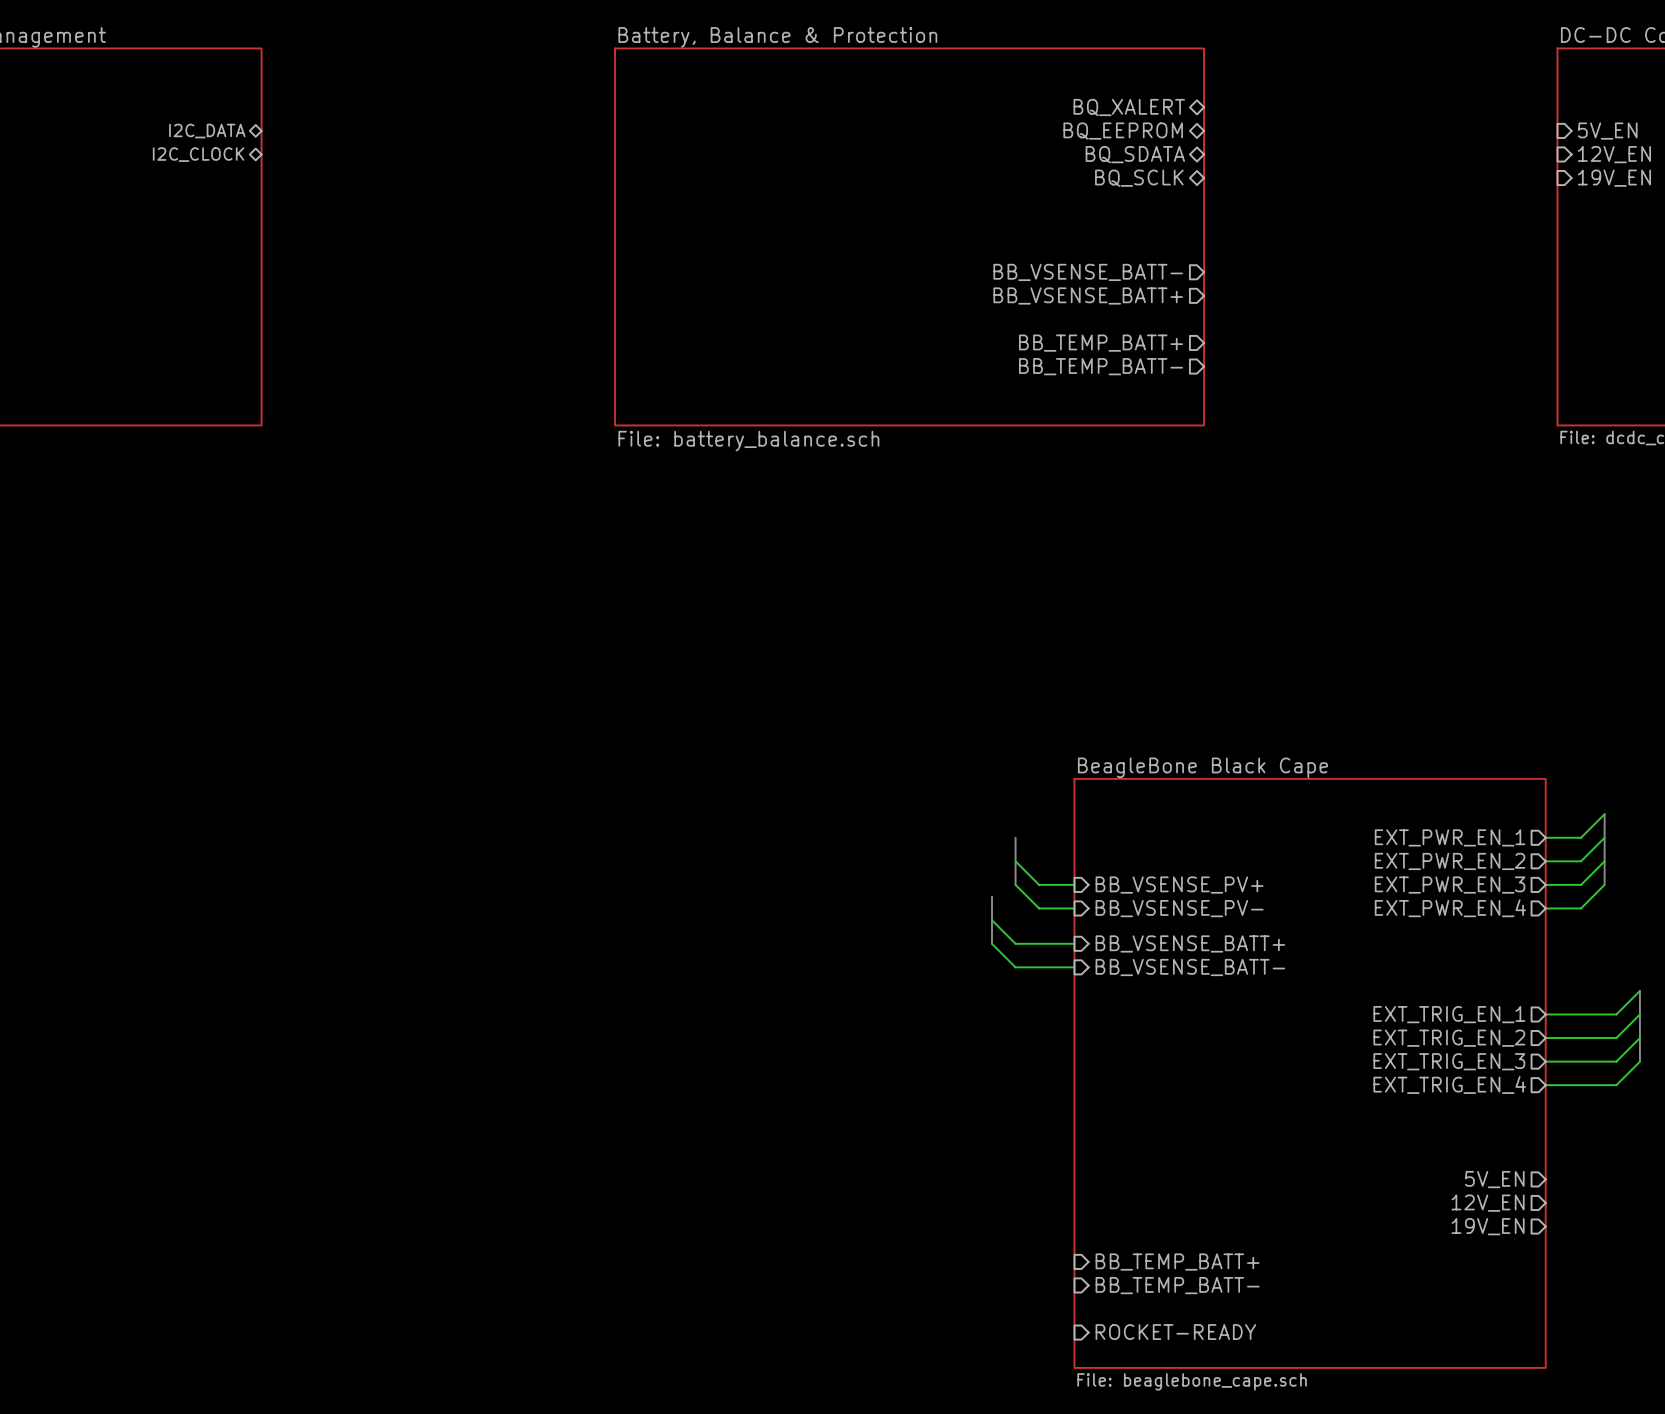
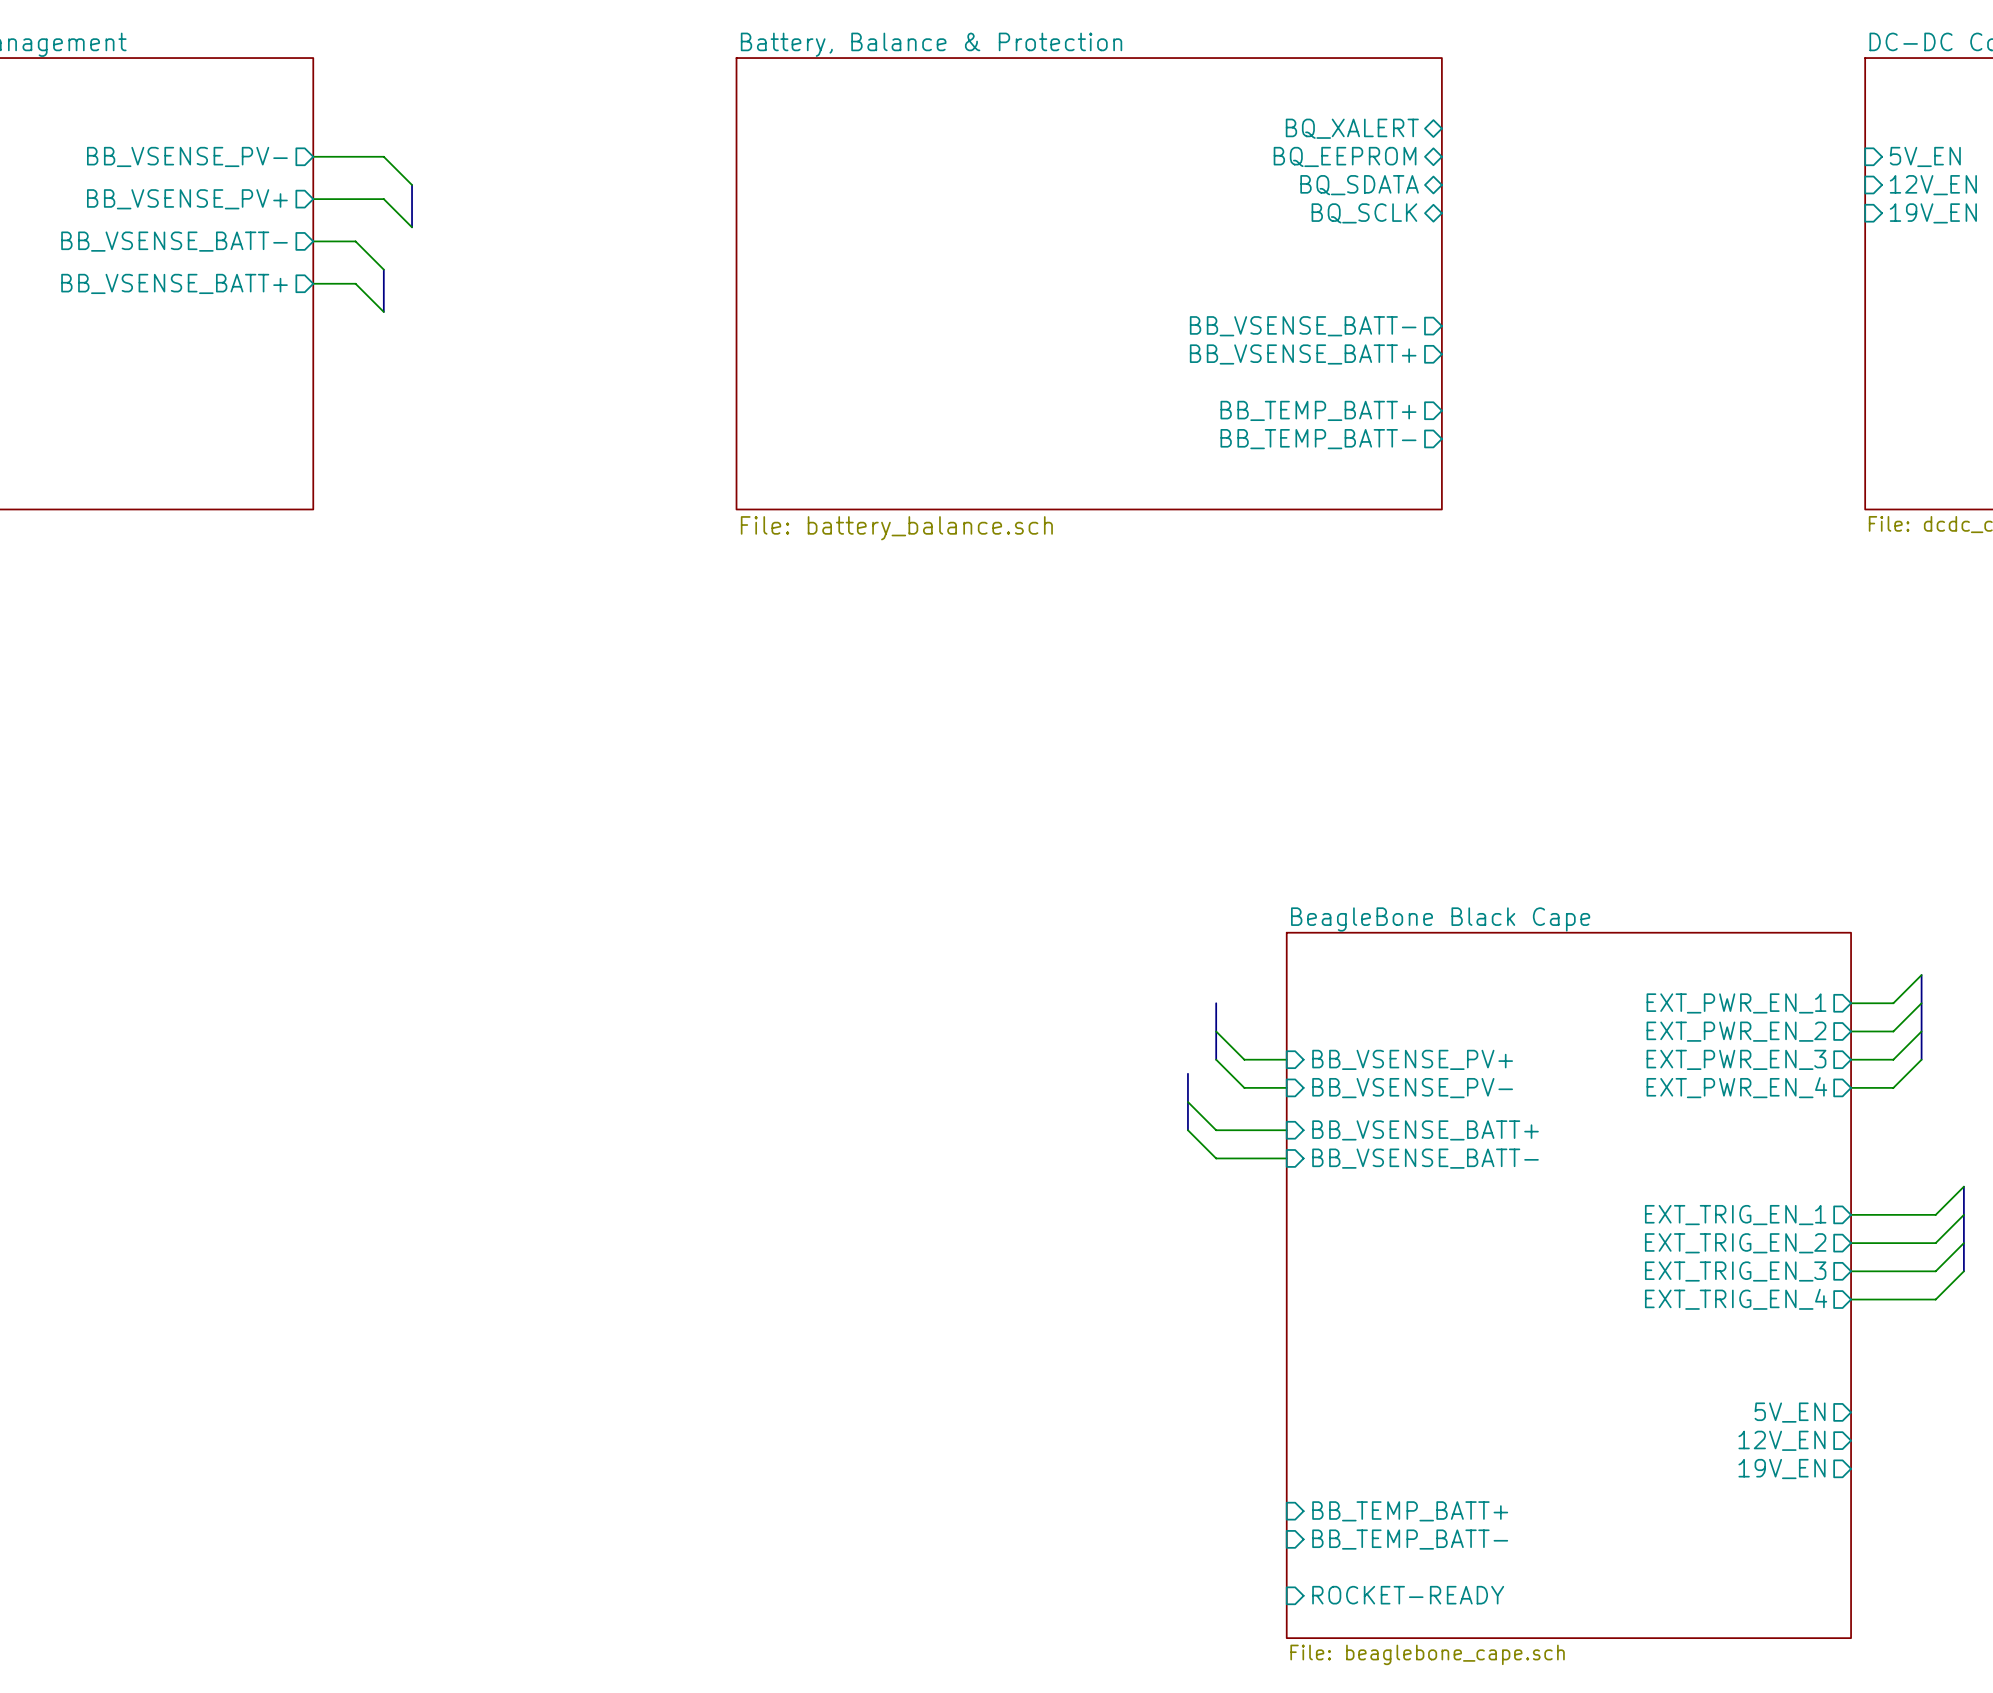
wire: none -> (313, 156) (383, 156) (412, 184)
sheet pin shape: bidirectional (207, 131) -> output (187, 156)
sheet pin: I2C_DATA (207, 131) -> BB_VSENSE_PV- (187, 156)
sheet pin: I2C_CLOCK (198, 154) -> none
bus: none -> (412, 184) (412, 227)
sheet pin: none -> BB_VSENSE_PV+ (187, 199)
wire: none -> (313, 199) (383, 199) (412, 227)
sheet pin: none -> BB_VSENSE_BATT- (174, 241)
wire: none -> (313, 241) (355, 241) (383, 269)
bus: none -> (383, 269) (383, 311)
wire: none -> (313, 283) (355, 283) (383, 311)
sheet pin: none -> BB_VSENSE_BATT+ (174, 283)

